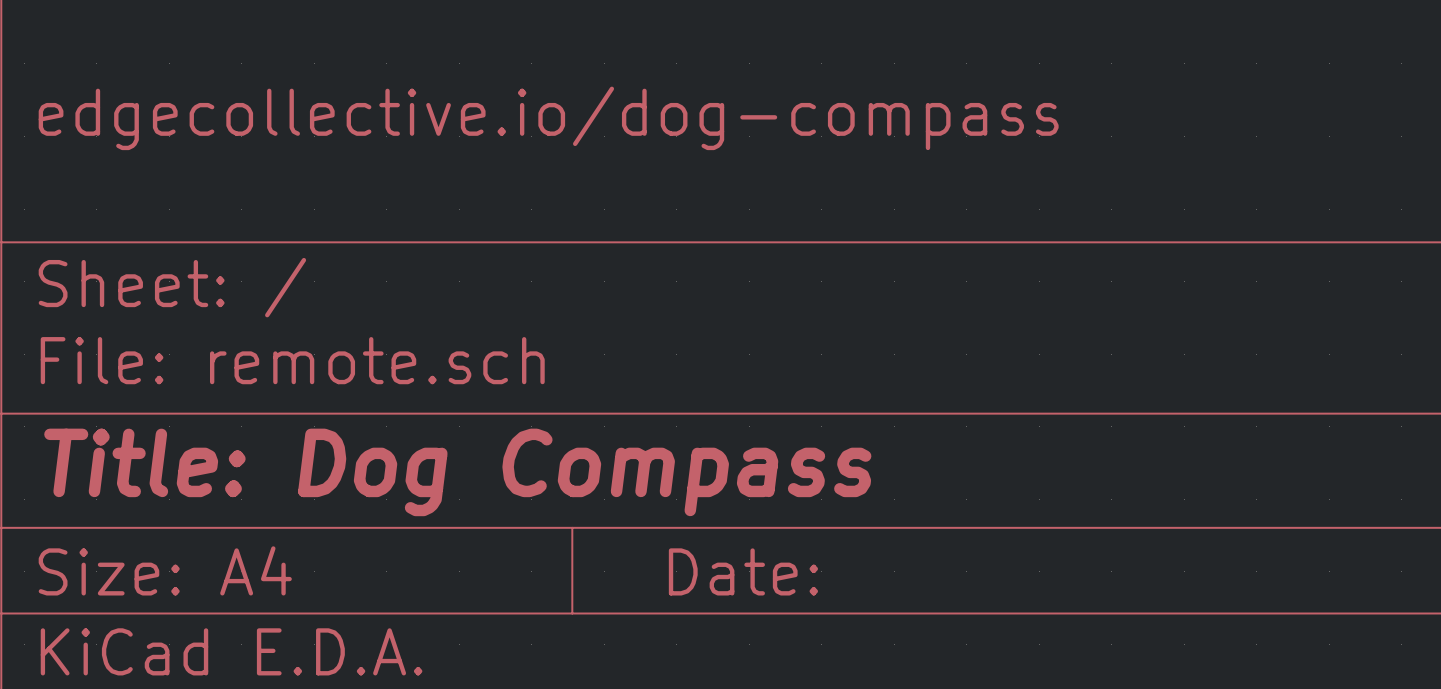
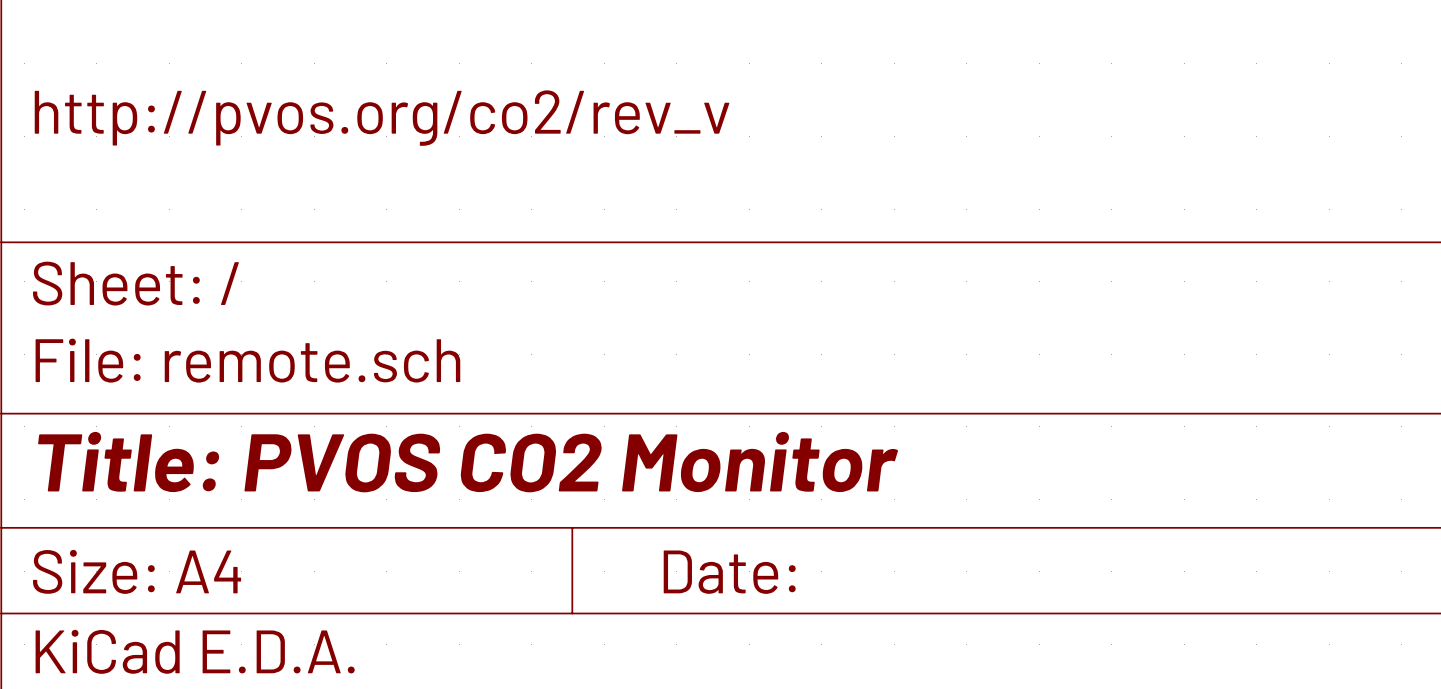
title block: edgecollective.io/dog-compass (548, 118) -> http://pvos.org/co2/rev_v (382, 118)
title block: Title: Dog Compass (457, 472) -> Title: PVOS CO2 Monitor (468, 462)

